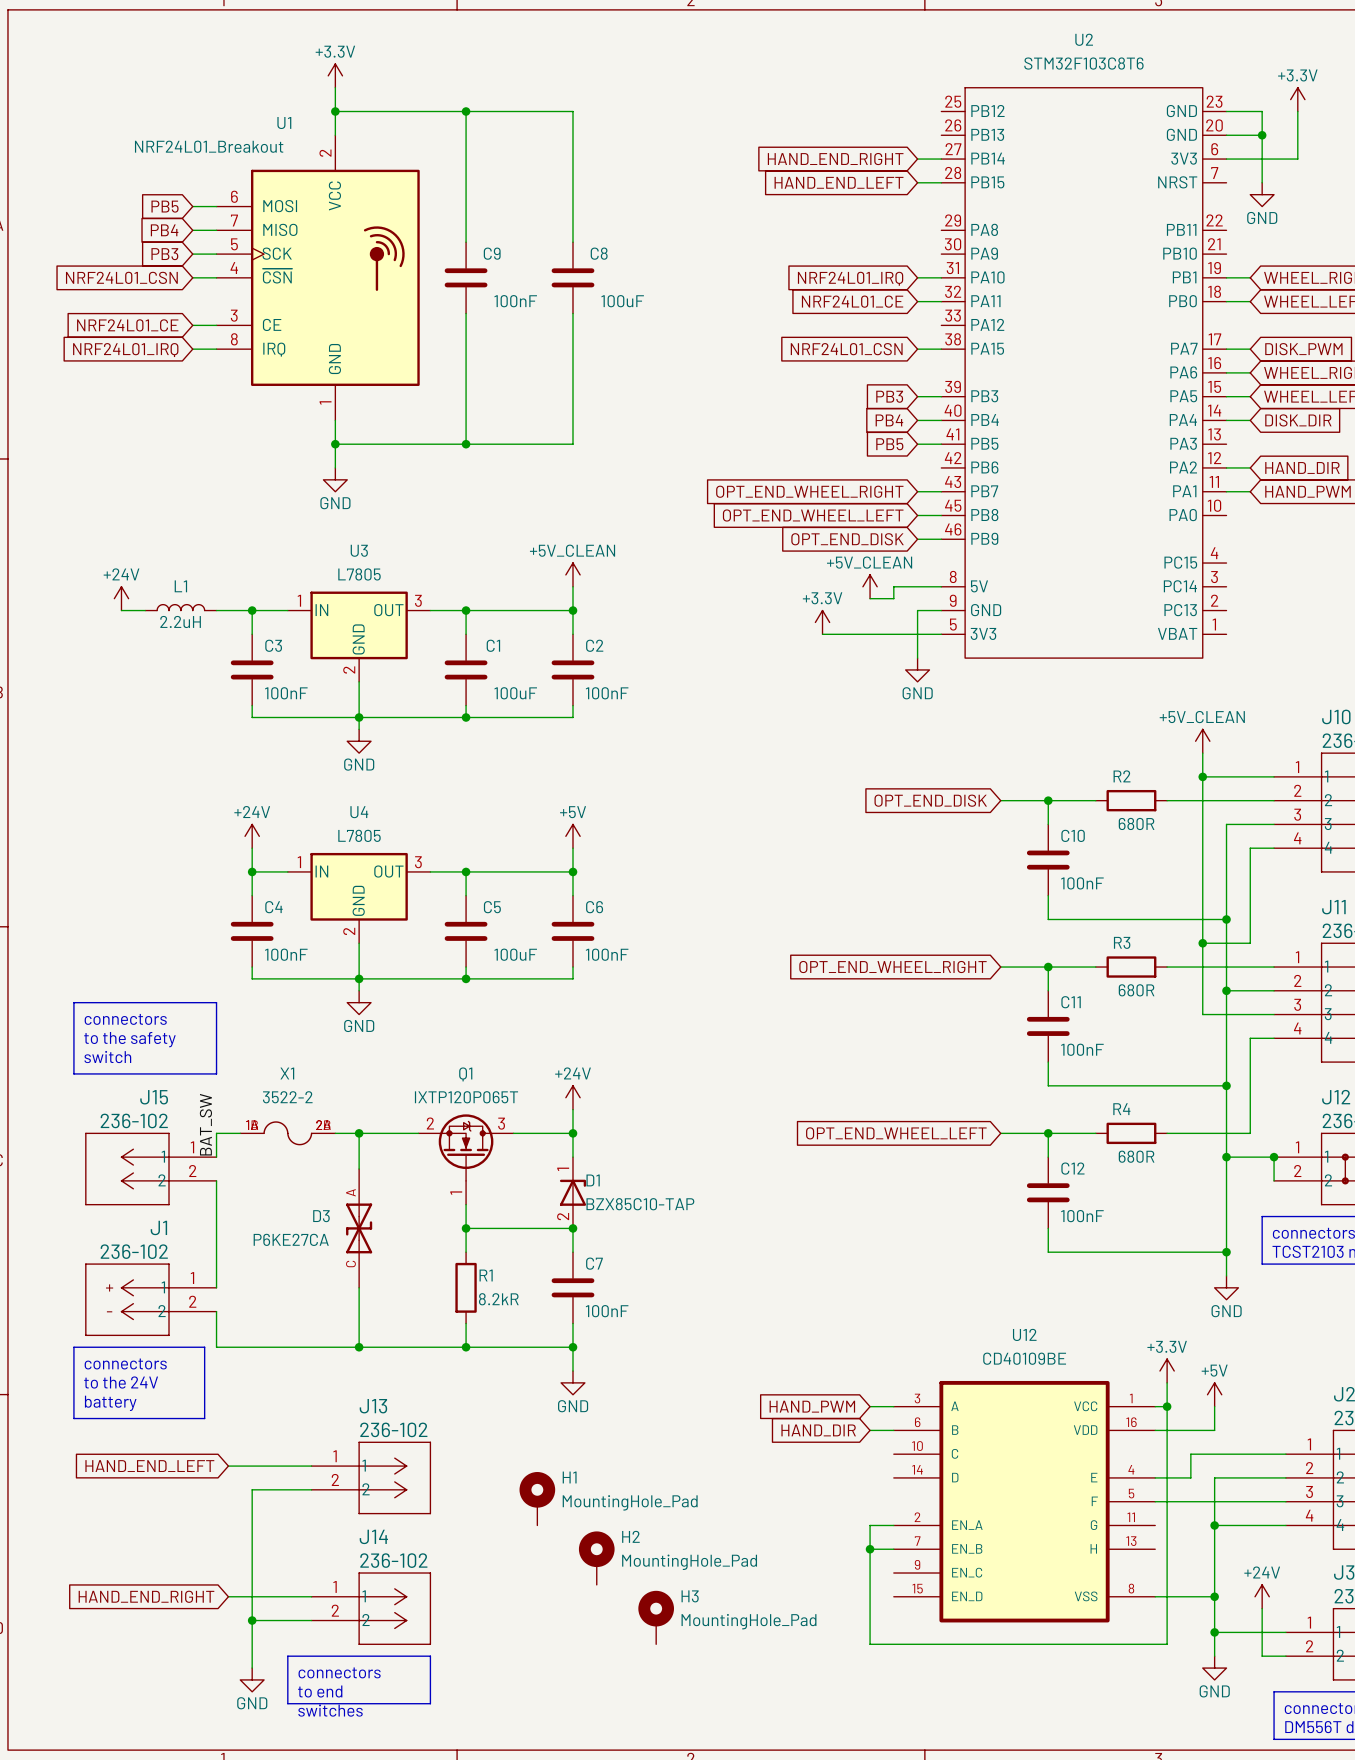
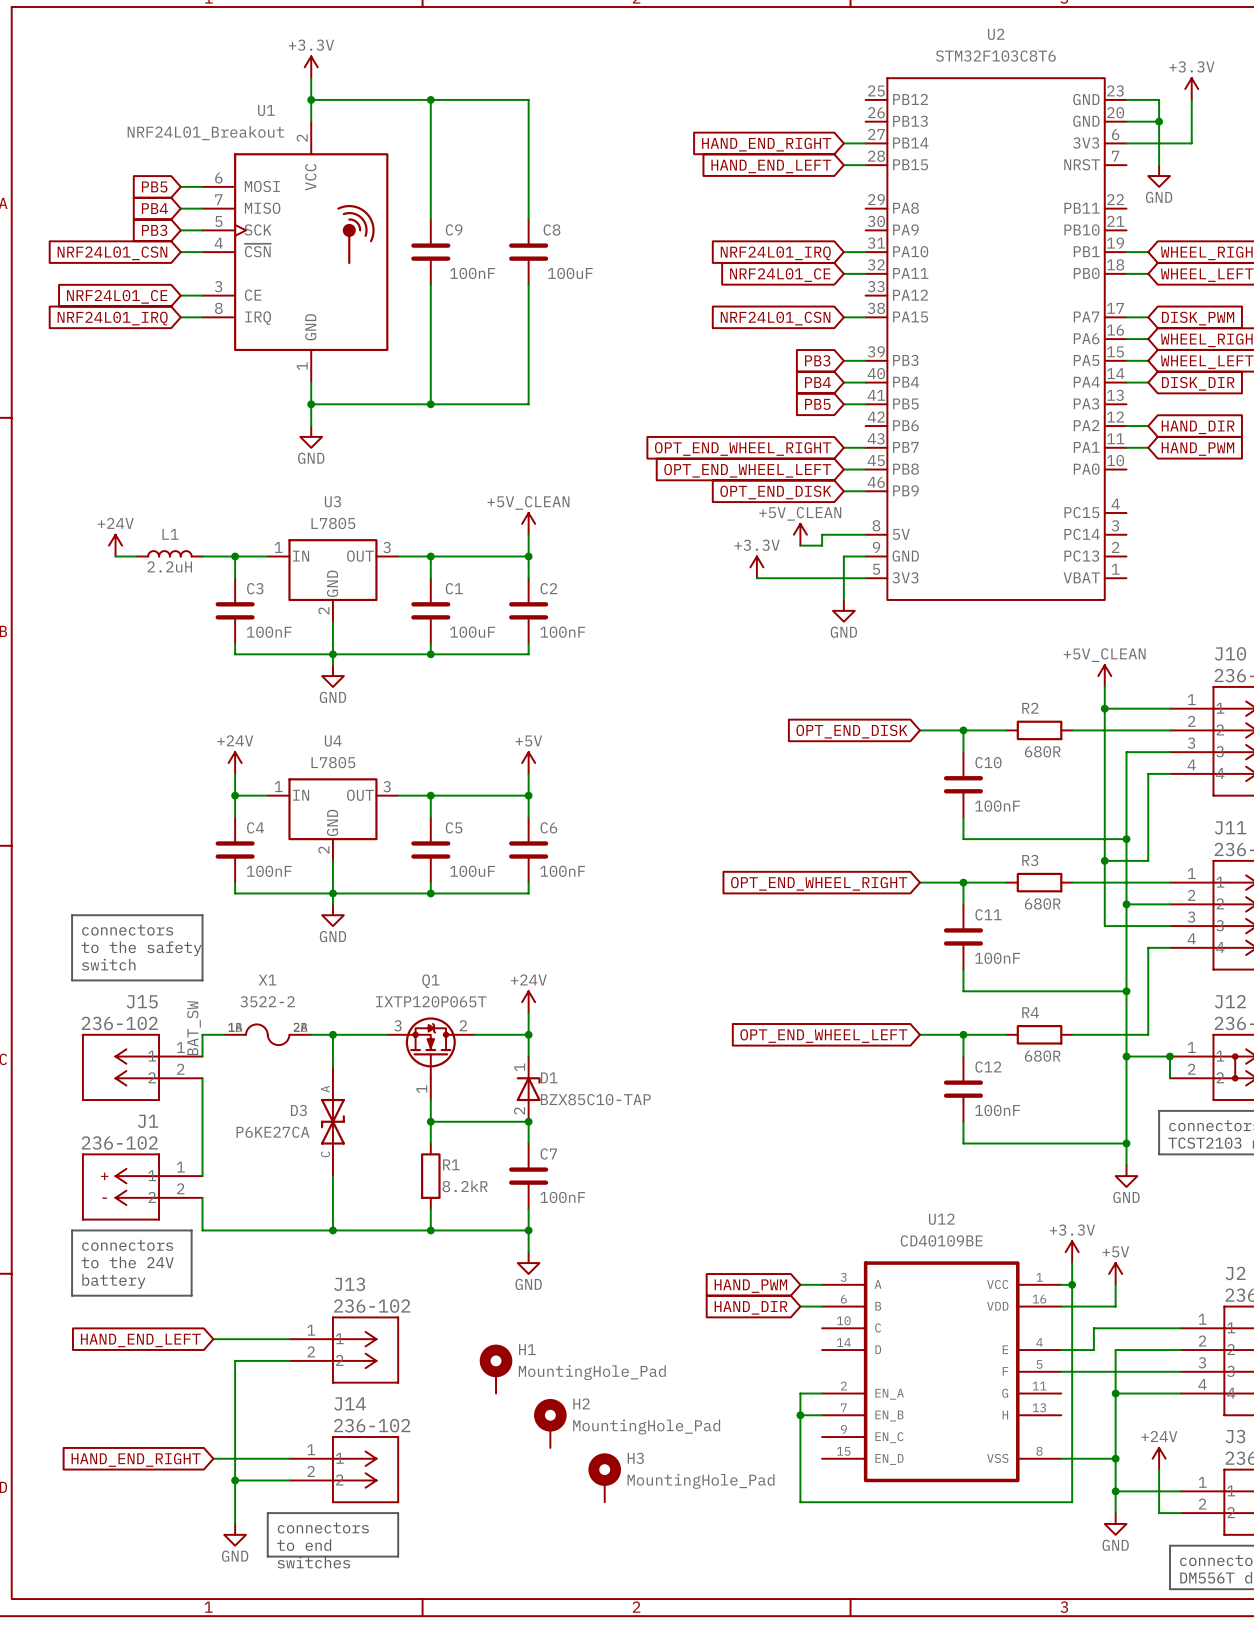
Q1 pin number: 2 (430, 1123) -> 3 (397, 1025)
Q1 pin number: 3 (501, 1123) -> 2 (463, 1025)

